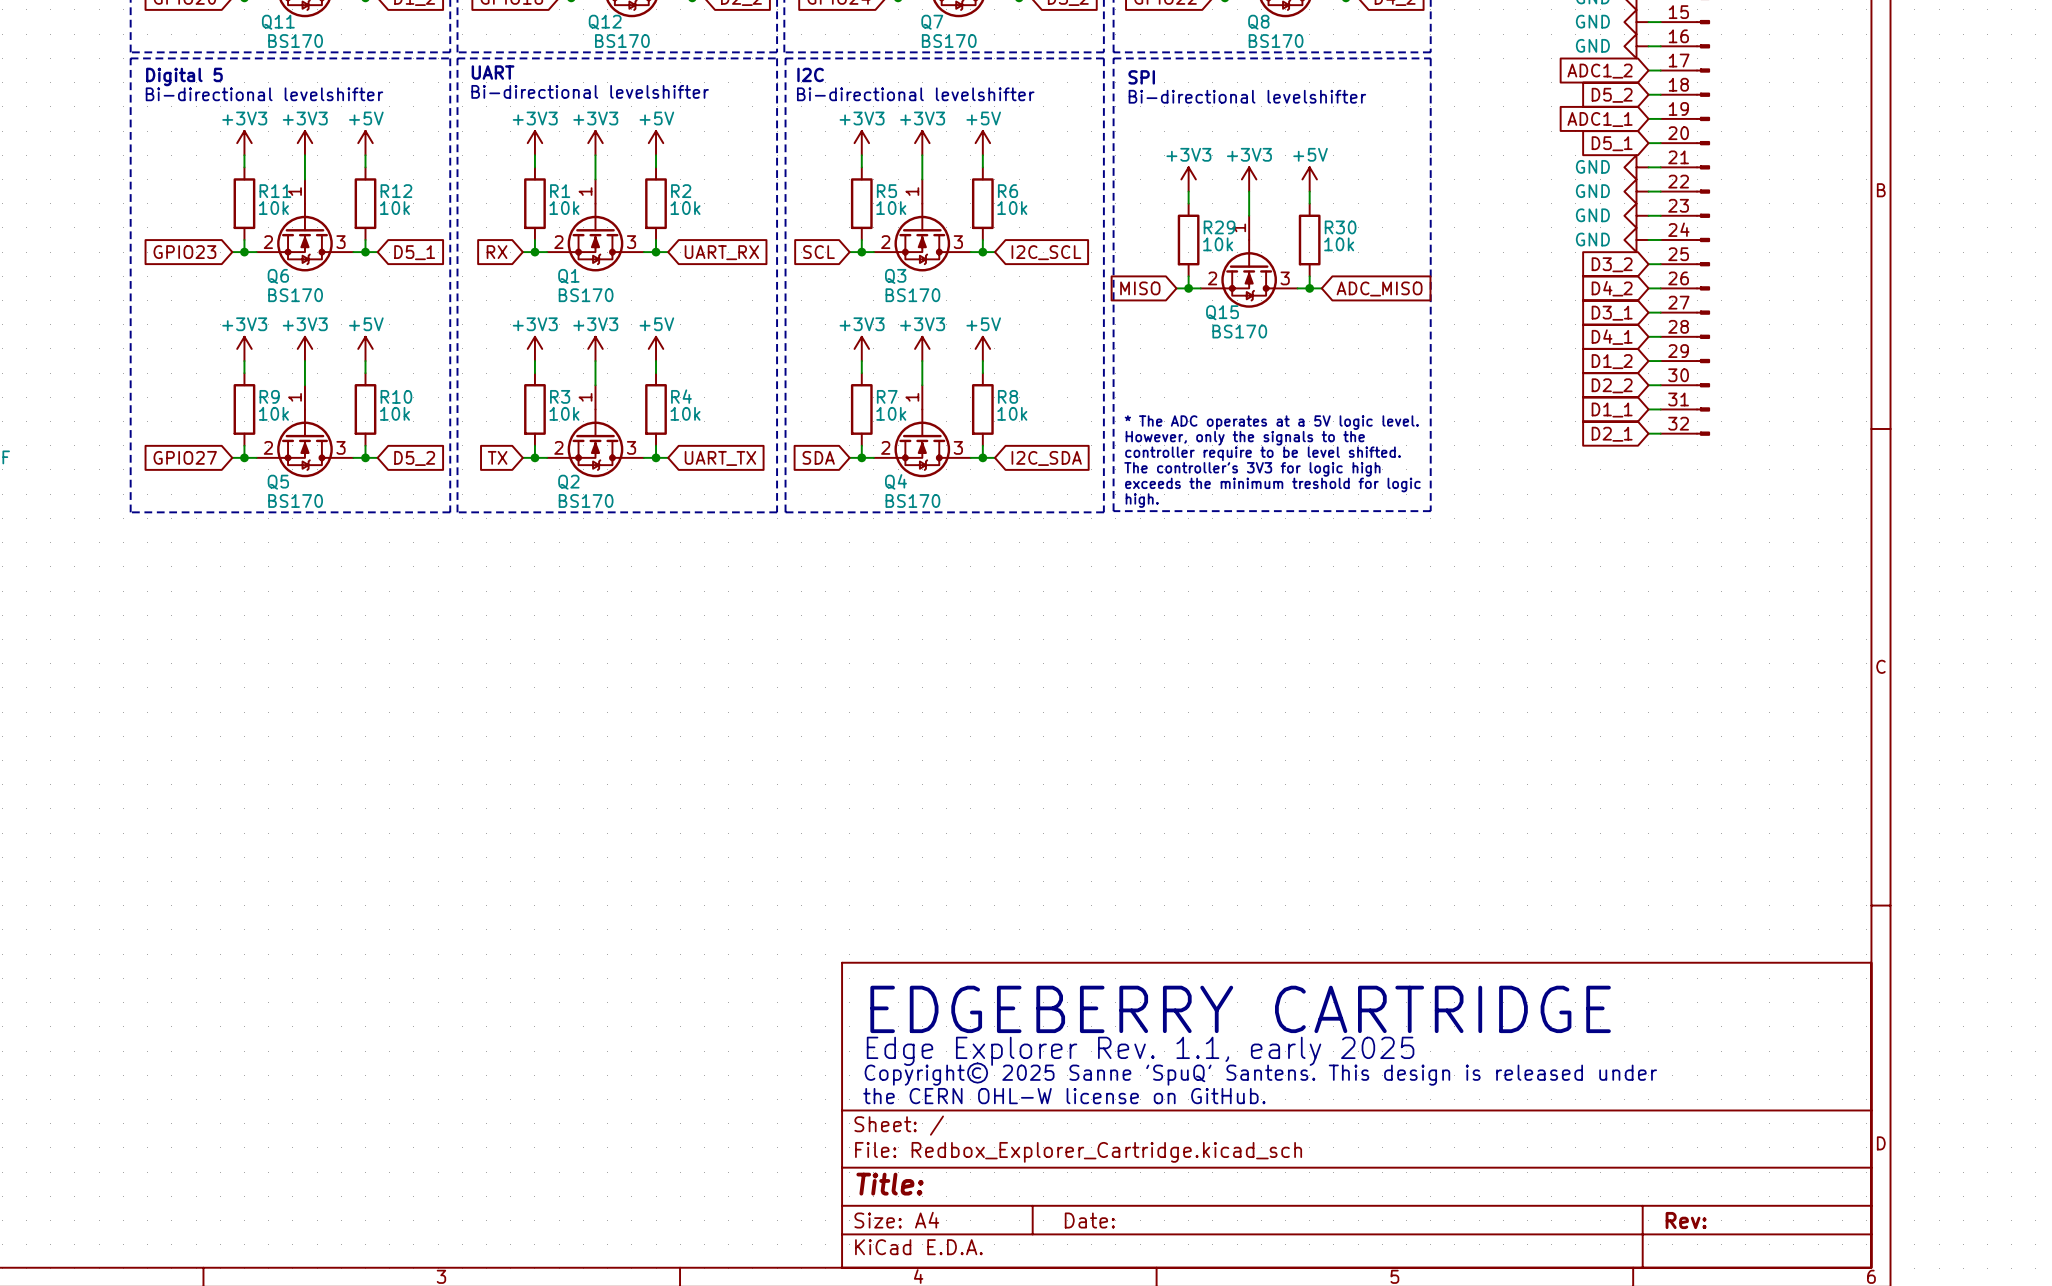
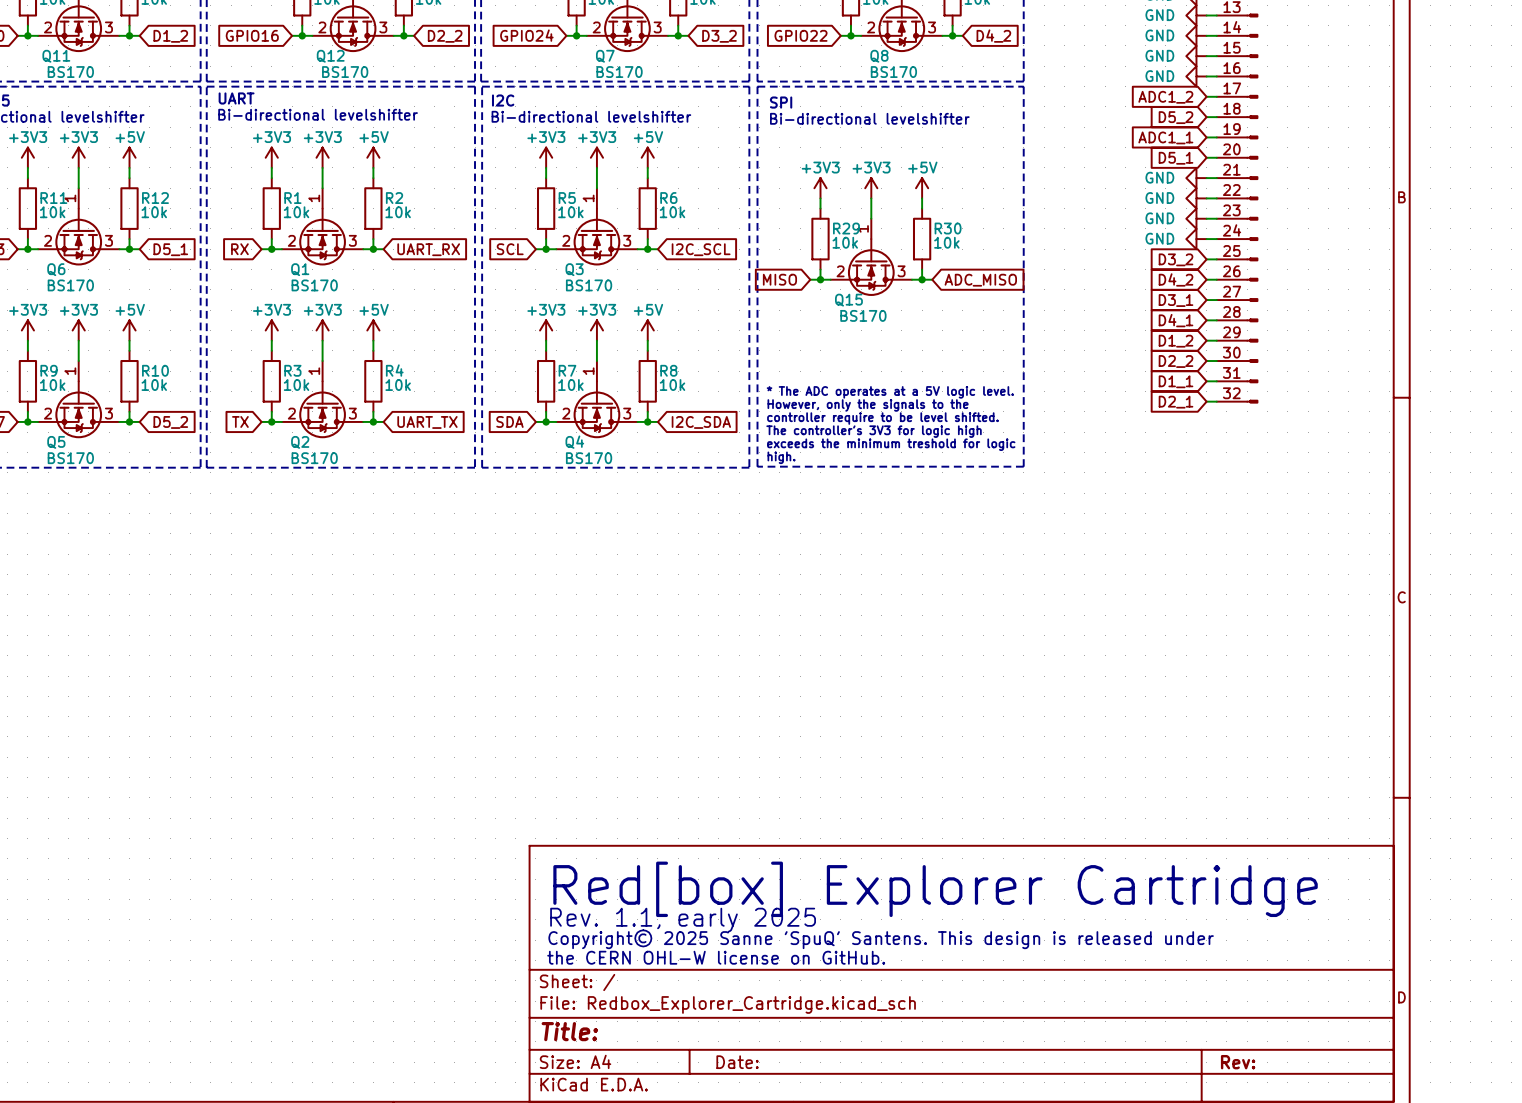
text: EDGEBERRY CARTRIDGE (1240, 1009) -> Red[box] Explorer Cartridge (935, 889)
text: Edge Explorer Rev. 1.1, early 2025 (1140, 1051) -> Rev. 1.1, early 2025 (683, 920)

